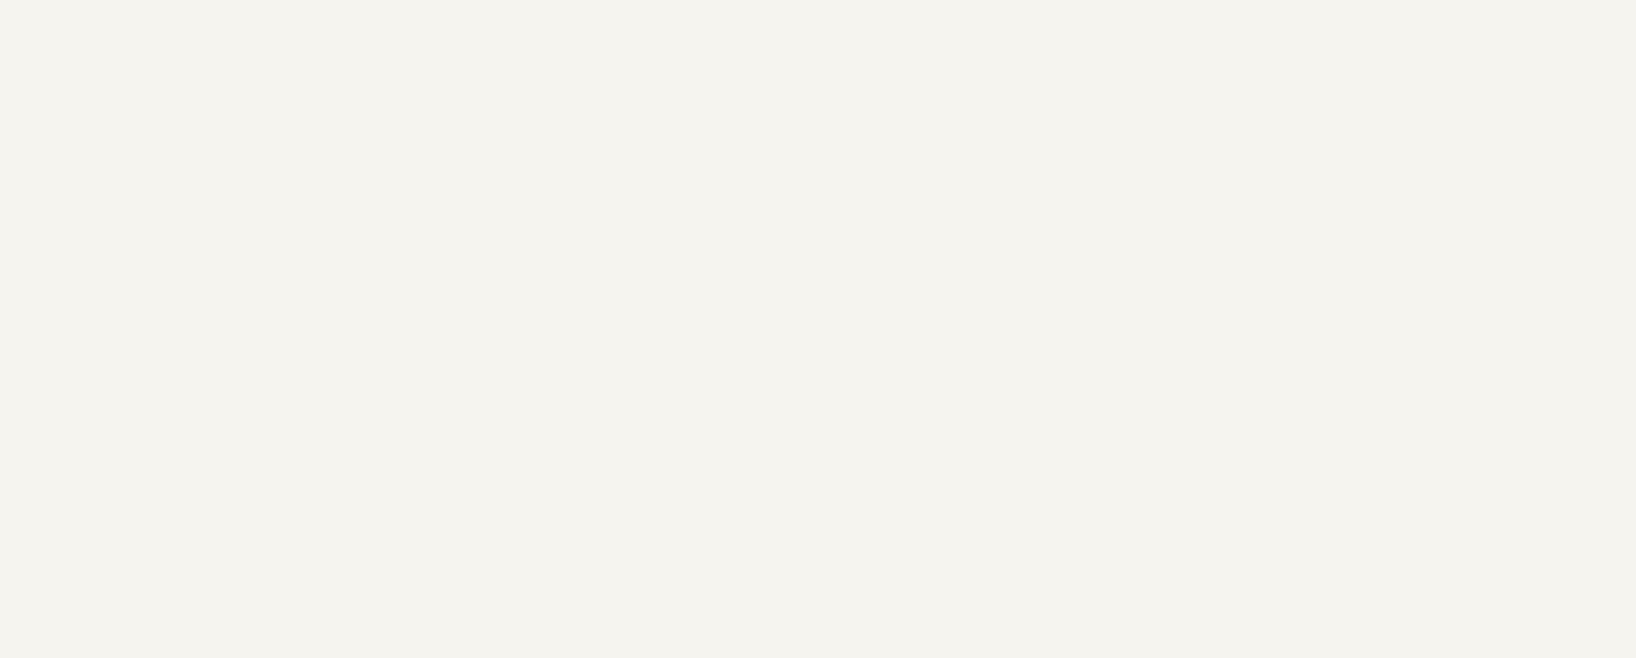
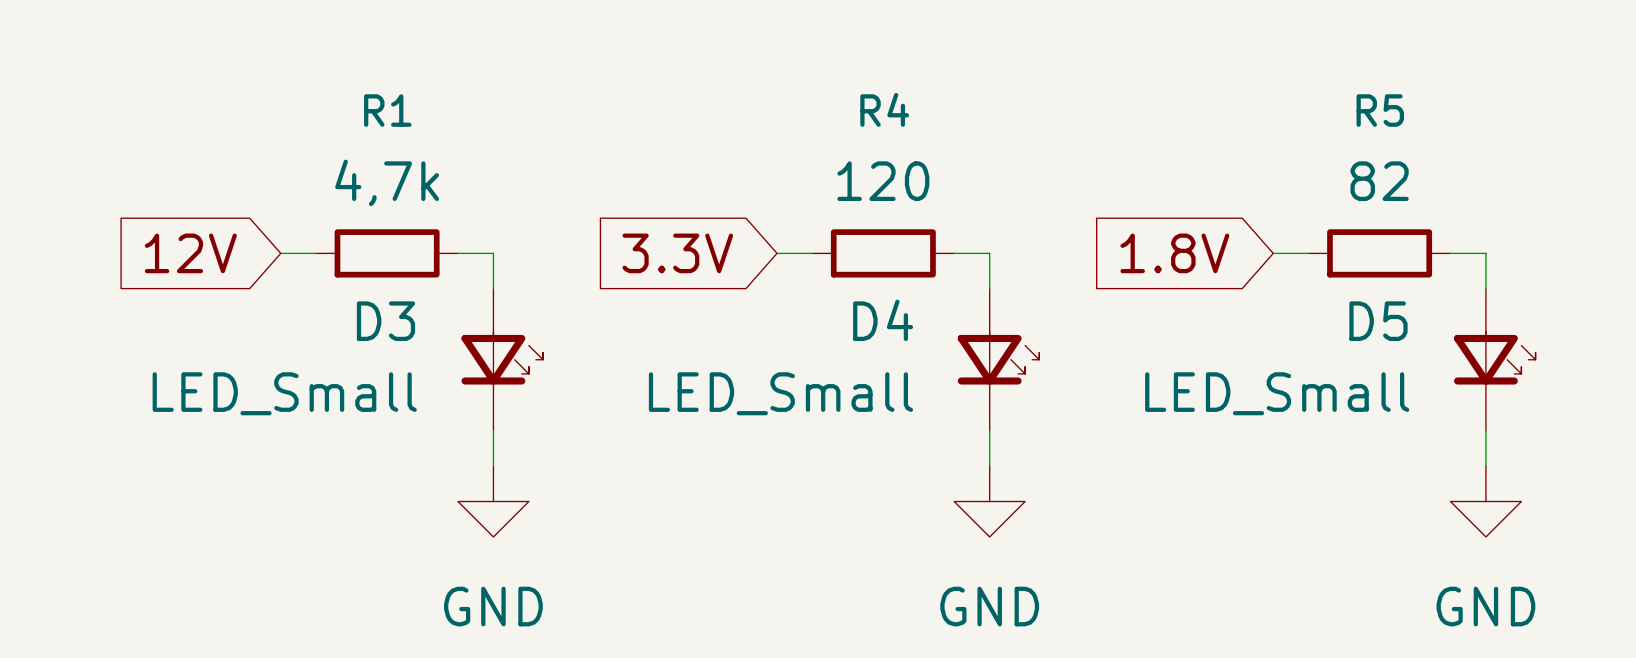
global label: none -> 12V (190, 253)
wire: none -> (280, 253) (316, 253)
R1: none -> 4,7k (387, 253)
wire: none -> (457, 253) (493, 253) (493, 288)
global label: none -> 3.3V (677, 253)
wire: none -> (777, 253) (812, 253)
R4: none -> 120 (883, 253)
wire: none -> (954, 253) (989, 253) (989, 288)
global label: none -> 1.8V (1174, 253)
wire: none -> (1273, 253) (1308, 253)
R5: none -> 82 (1379, 253)
wire: none -> (1450, 253) (1485, 253) (1485, 288)
D3: none -> LED_Small (502, 359)
D4: none -> LED_Small (998, 359)
D5: none -> LED_Small (1494, 359)
wire: none -> (493, 430) (493, 466)
wire: none -> (989, 430) (989, 466)
wire: none -> (1485, 430) (1485, 466)
power symbol: none -> GND (493, 501)
power symbol: none -> GND (989, 501)
power symbol: none -> GND (1485, 501)

